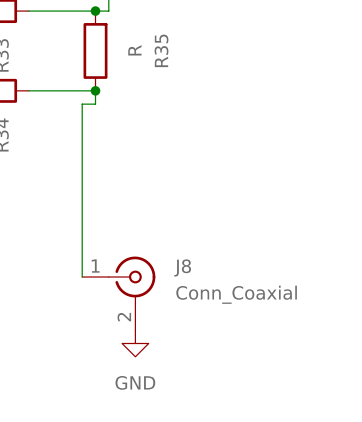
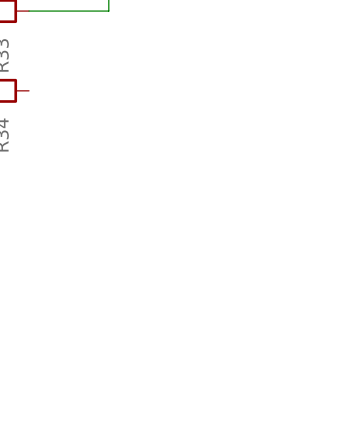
junction: (95, 11) -> none
R35: R (95, 50) -> none
wire: (29, 90) (95, 90) (95, 104) (82, 104) (82, 277) -> none
junction: (95, 90) -> none
J8: Conn_Coaxial (118, 293) -> none
power symbol: GND (135, 343) -> none

